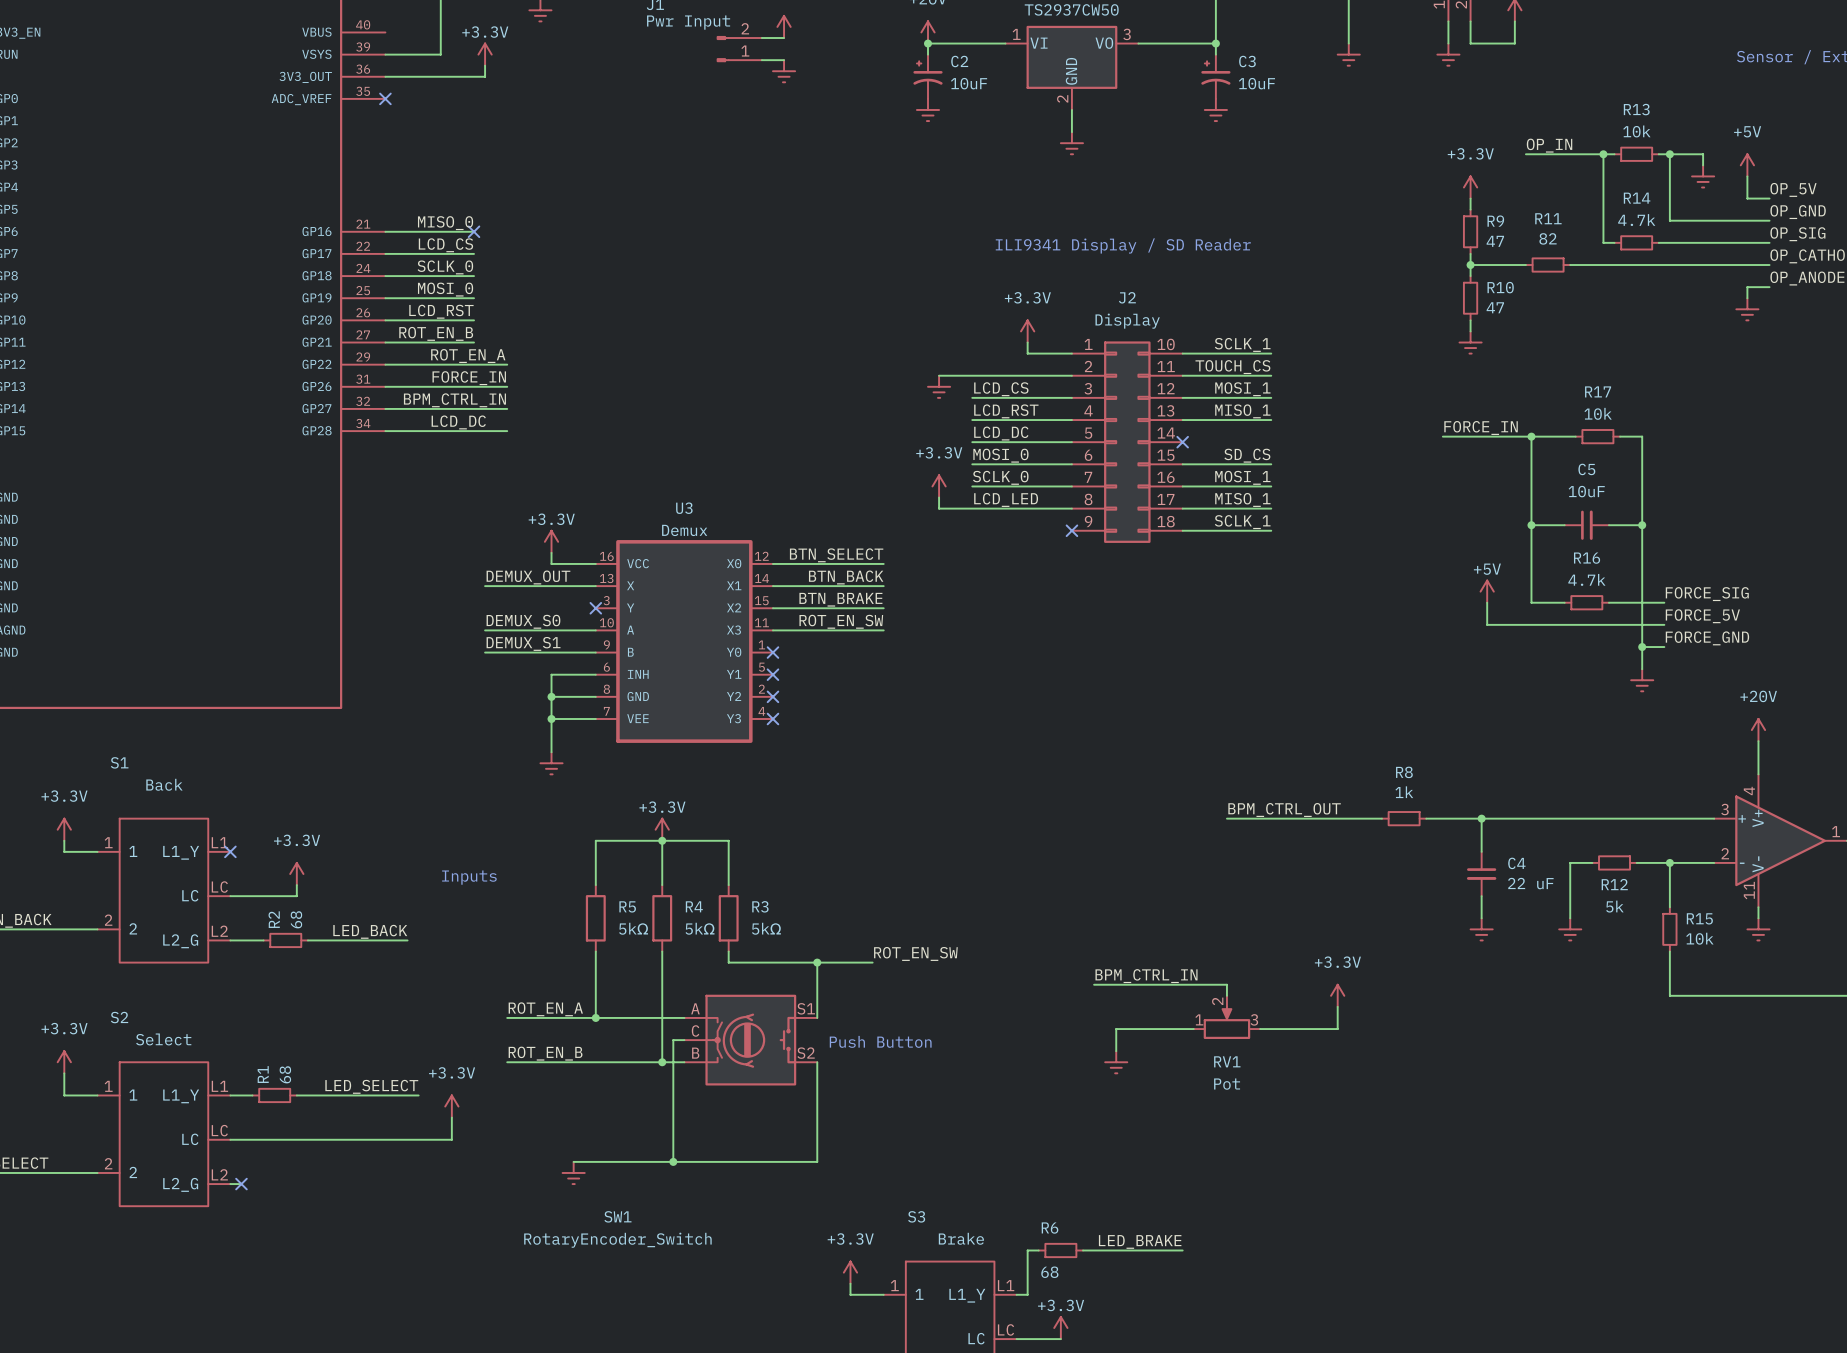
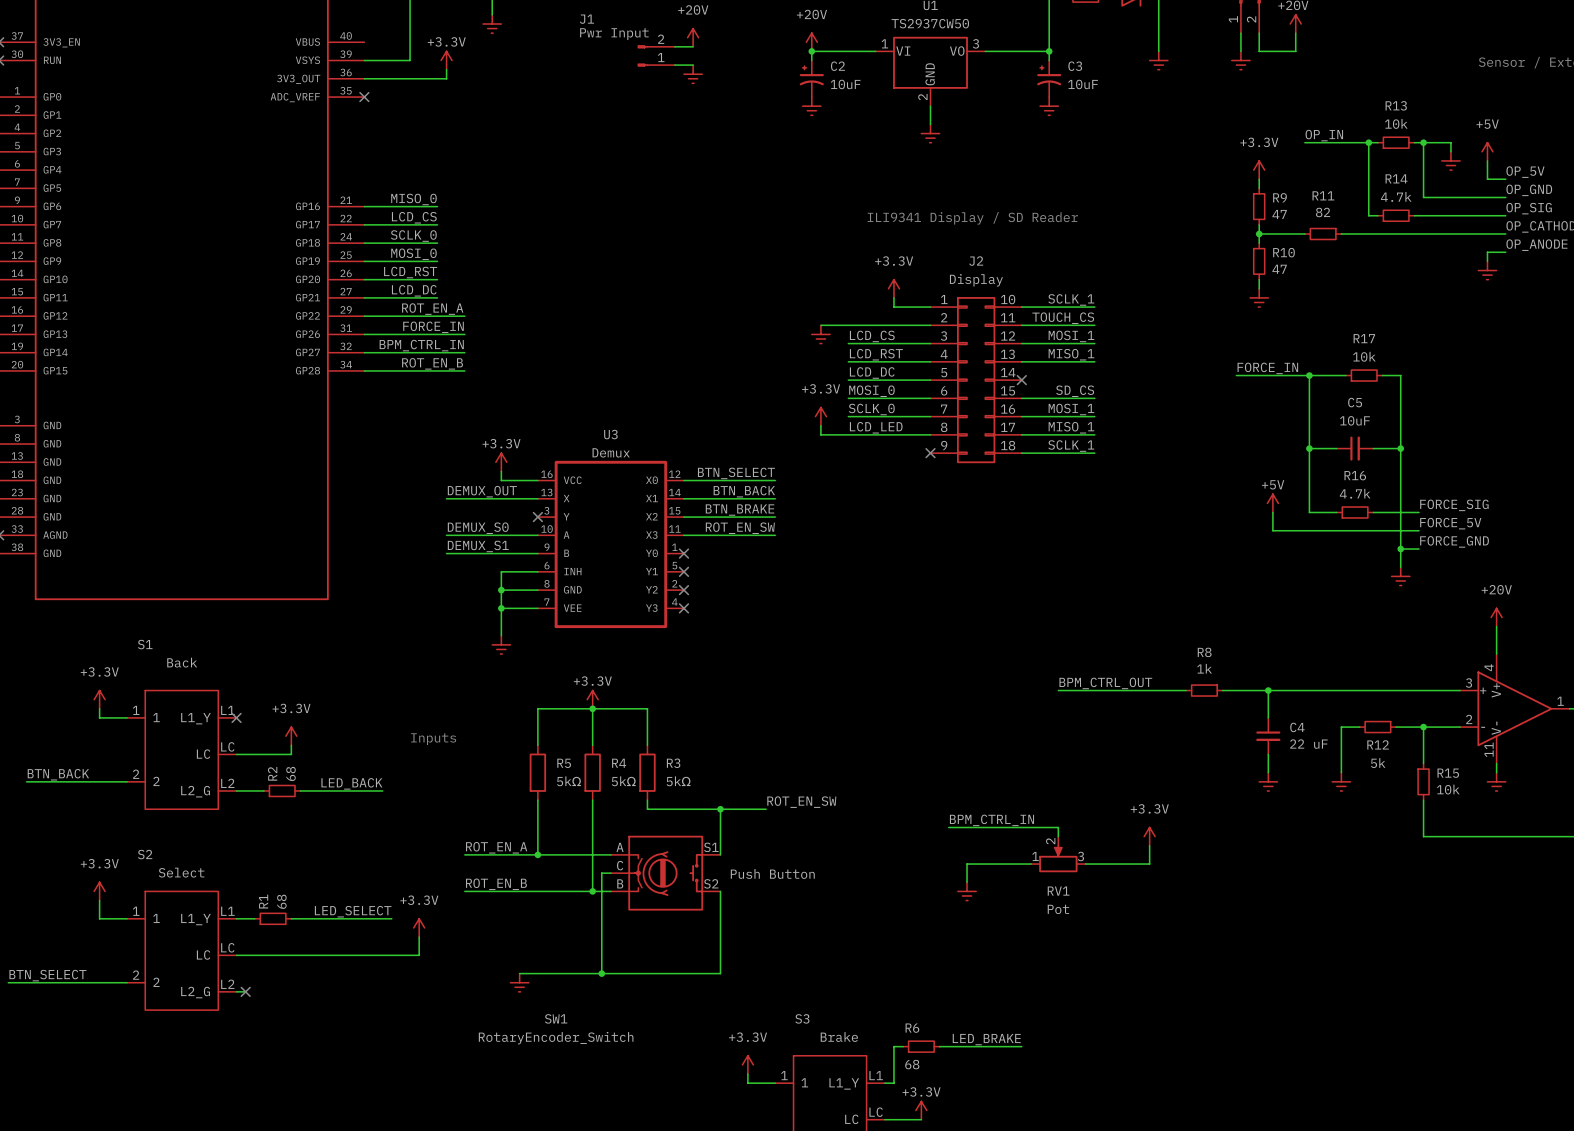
no-connect mark: (474, 231) -> none
label: ROT_EN_B (436, 333) -> LCD_DC (414, 290)
label: LCD_DC (458, 422) -> ROT_EN_B (432, 363)
text: Push Button (880, 1041) -> none
label: none -> Push Button (772, 873)

